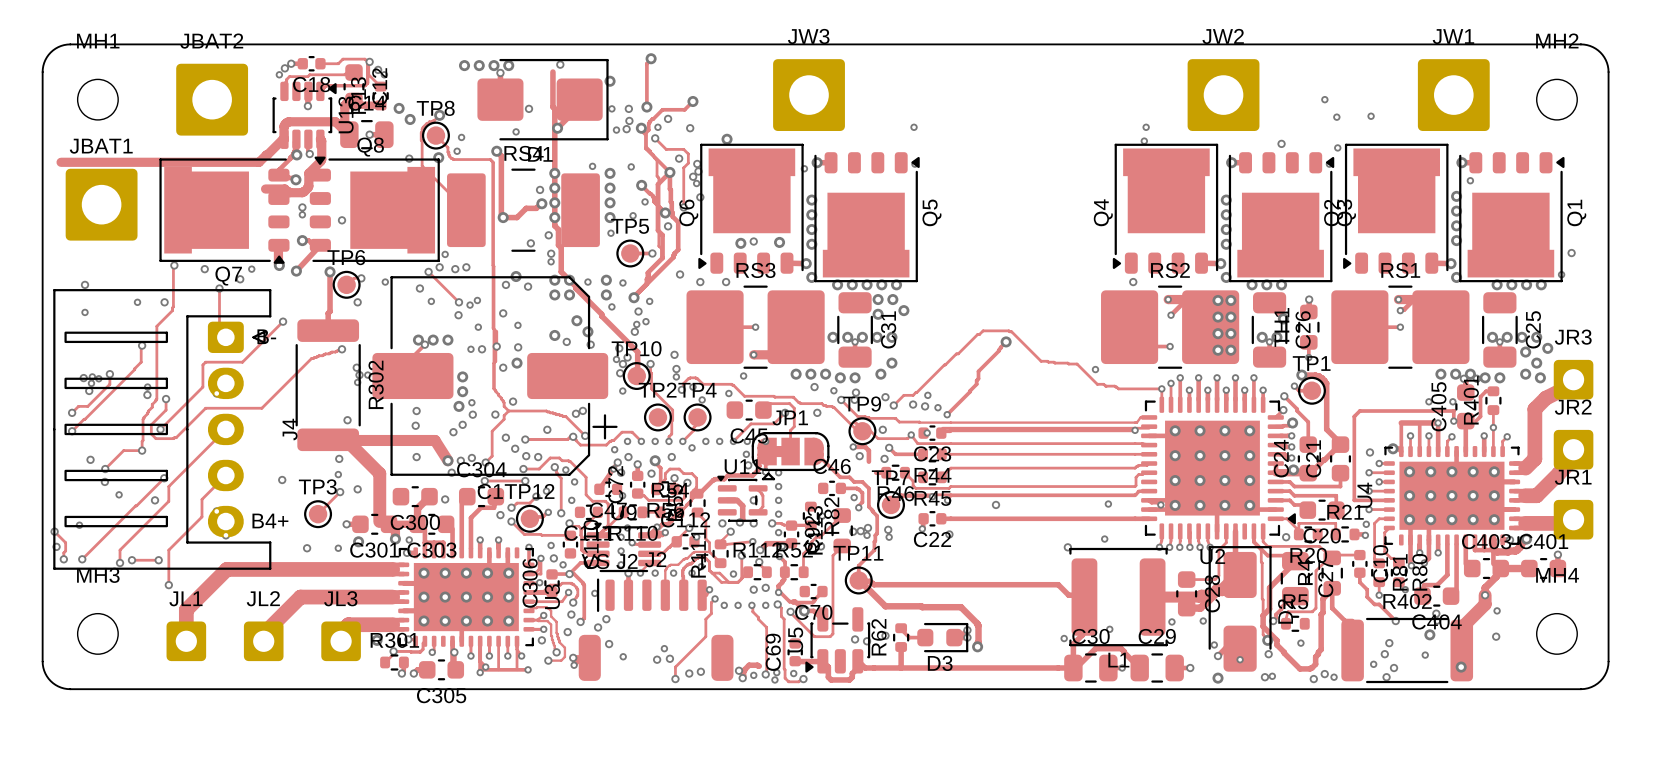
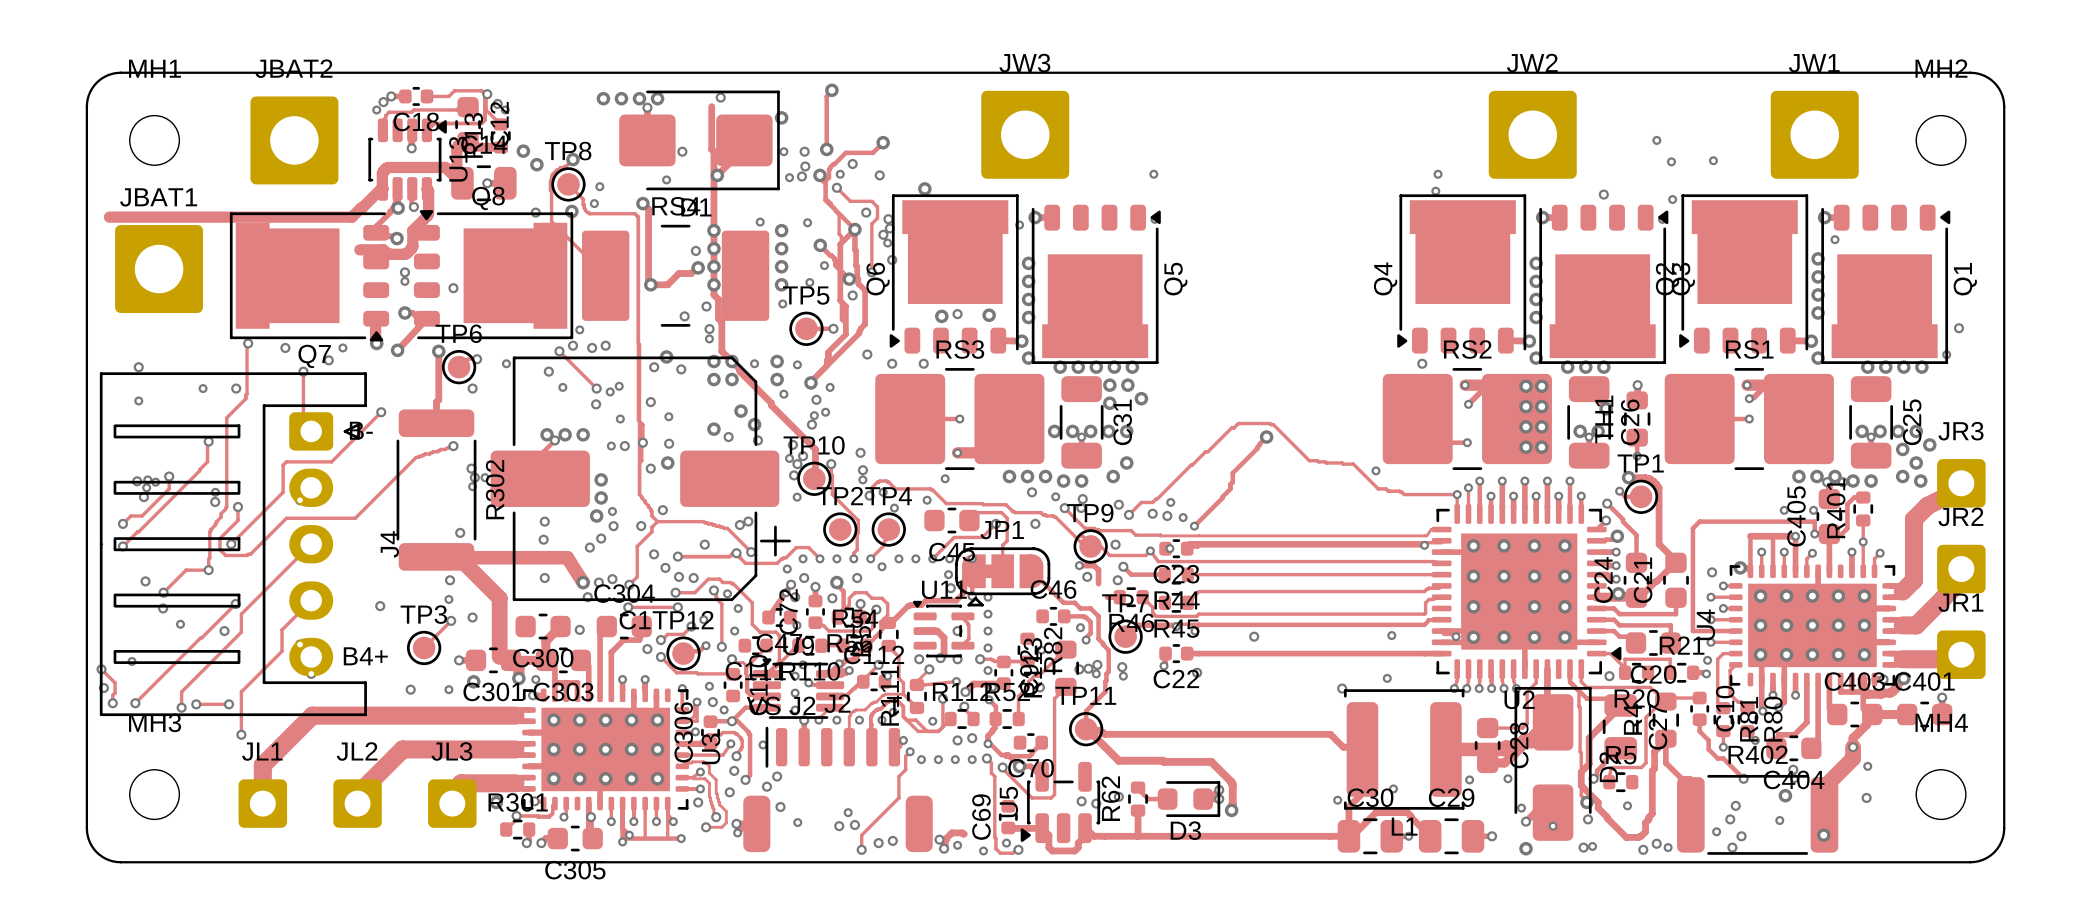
track: (751, 605) (752, 611) (766, 627) (765, 674) -> none
via: (776, 672) -> none
via: (765, 674) -> none

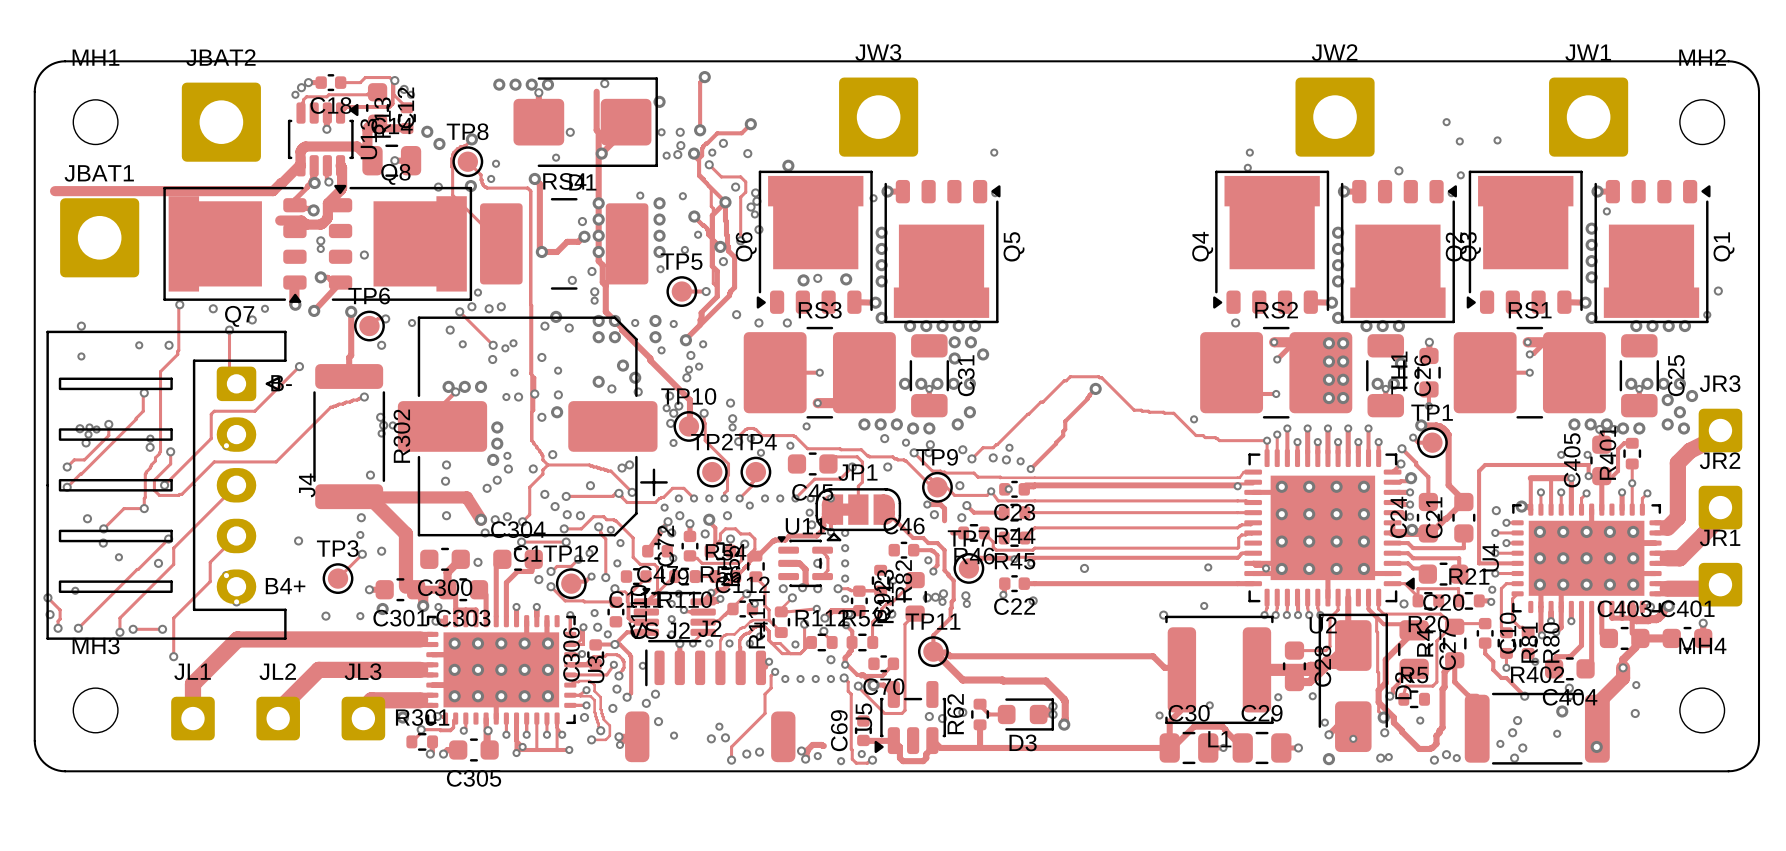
via: (957, 740) -> none

